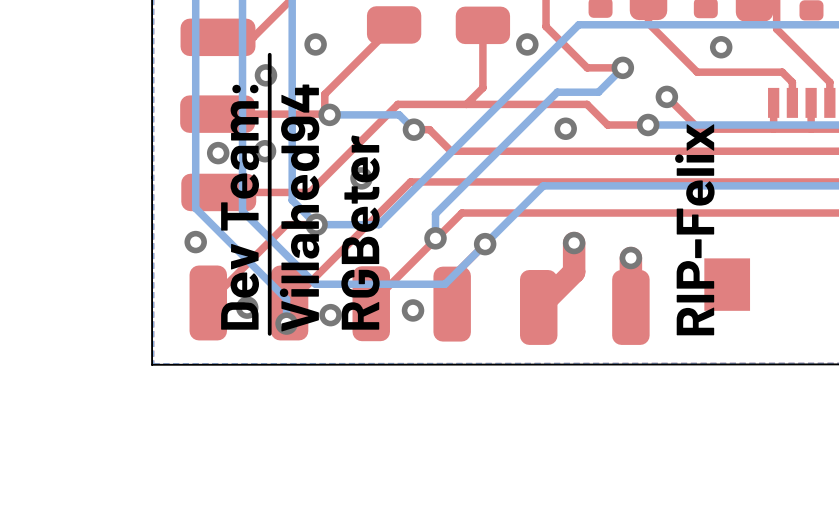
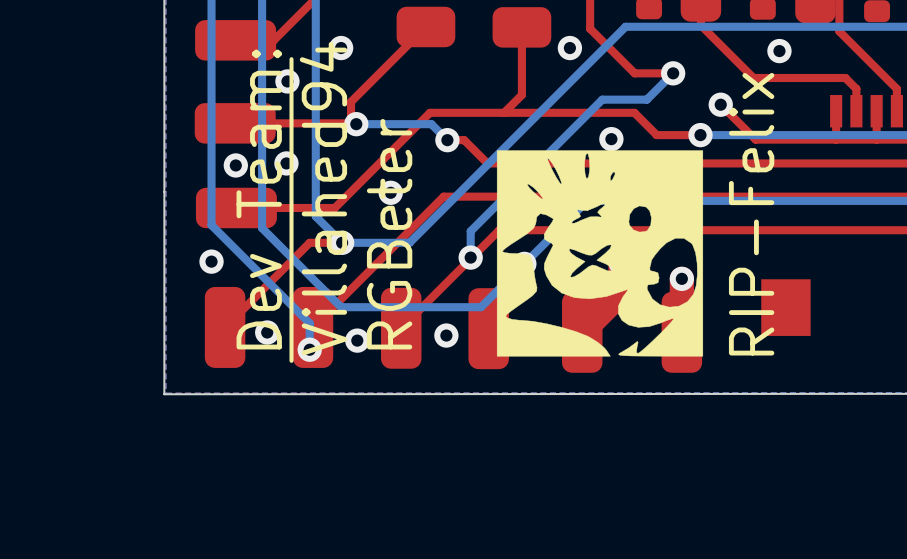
drawing: none -> [496, 150, 704, 357]

